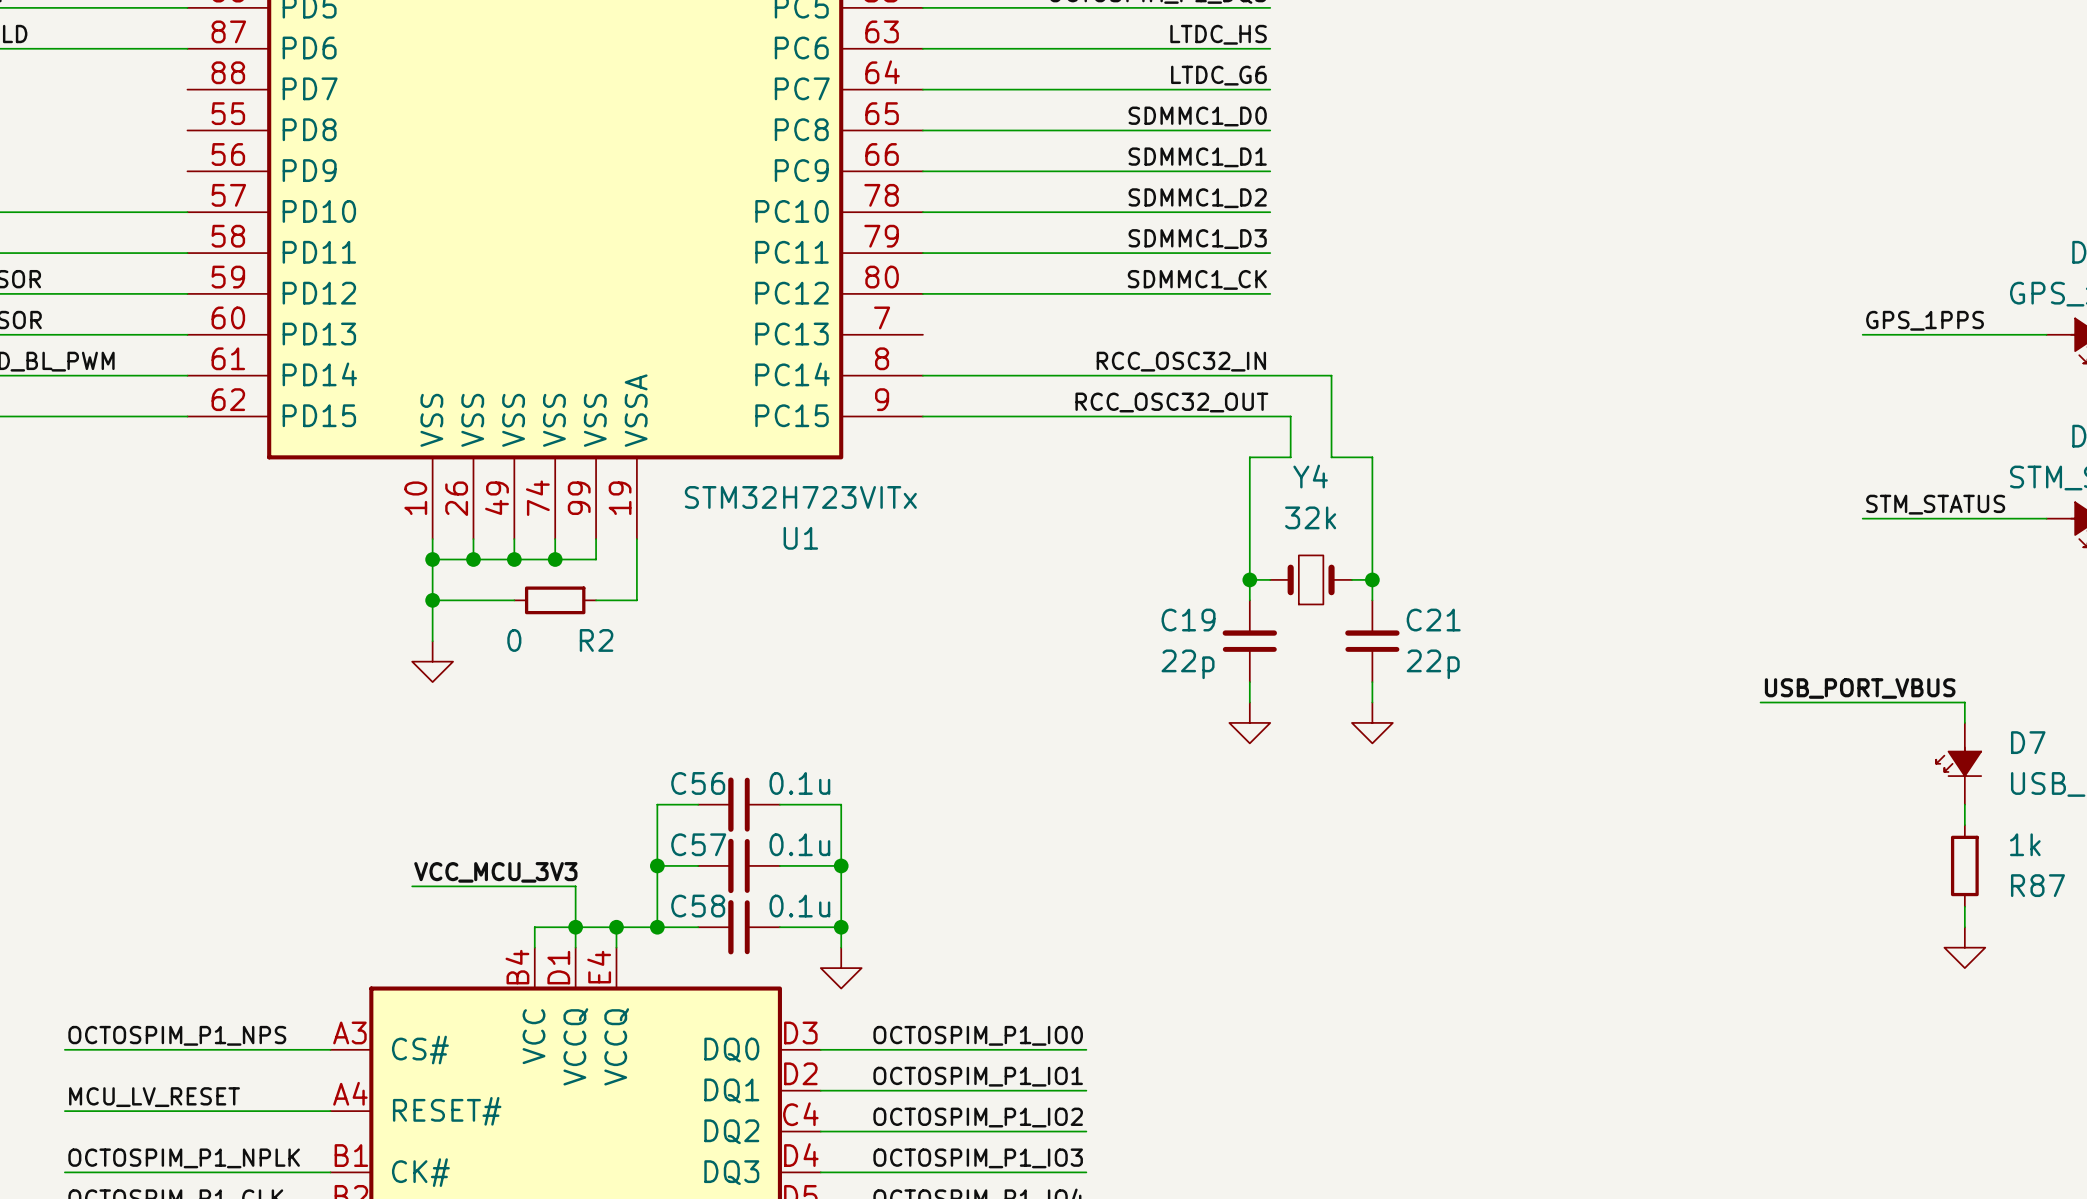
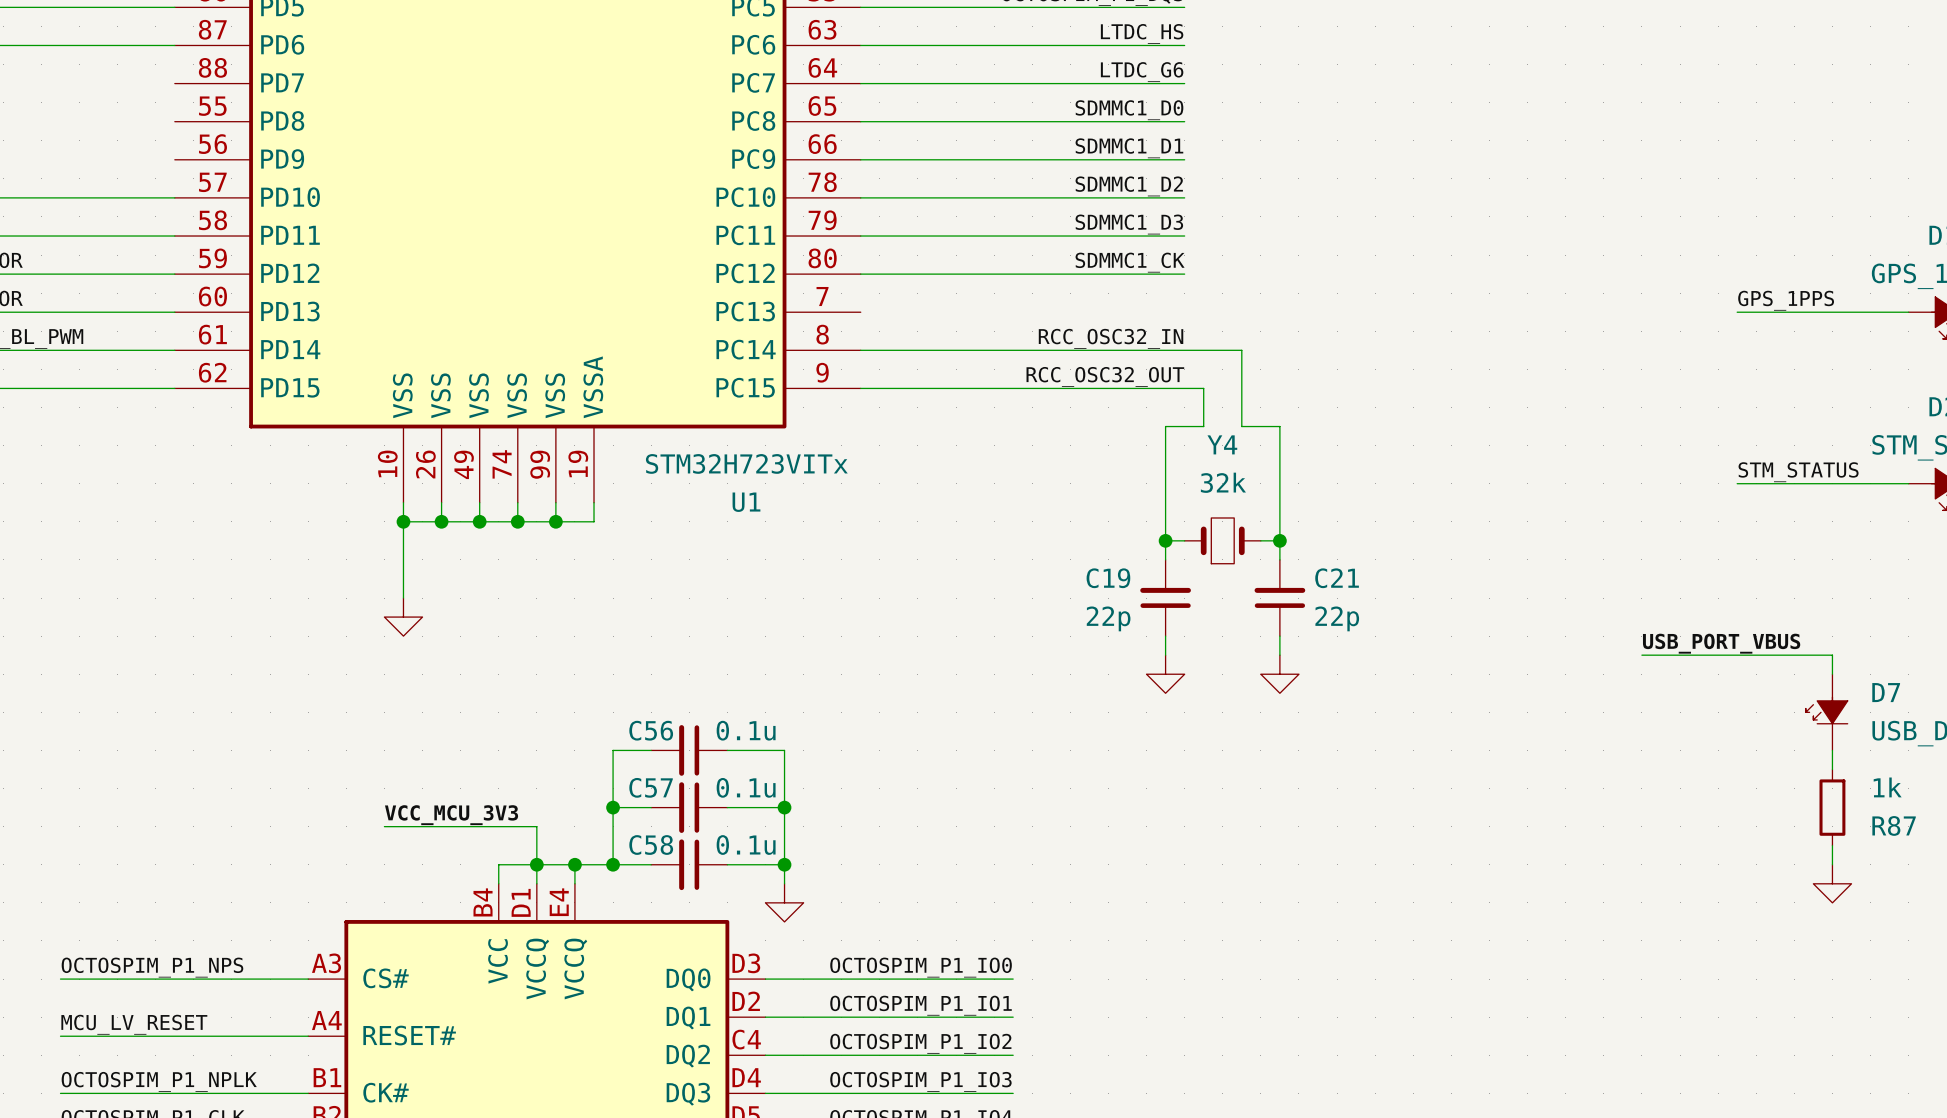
junction: none -> (555, 521)
wire: (636, 559) (636, 600) (596, 600) -> (594, 521) (555, 521)
wire: (432, 600) (514, 600) -> none
junction: (432, 600) -> none
R2: 0 (555, 600) -> none

